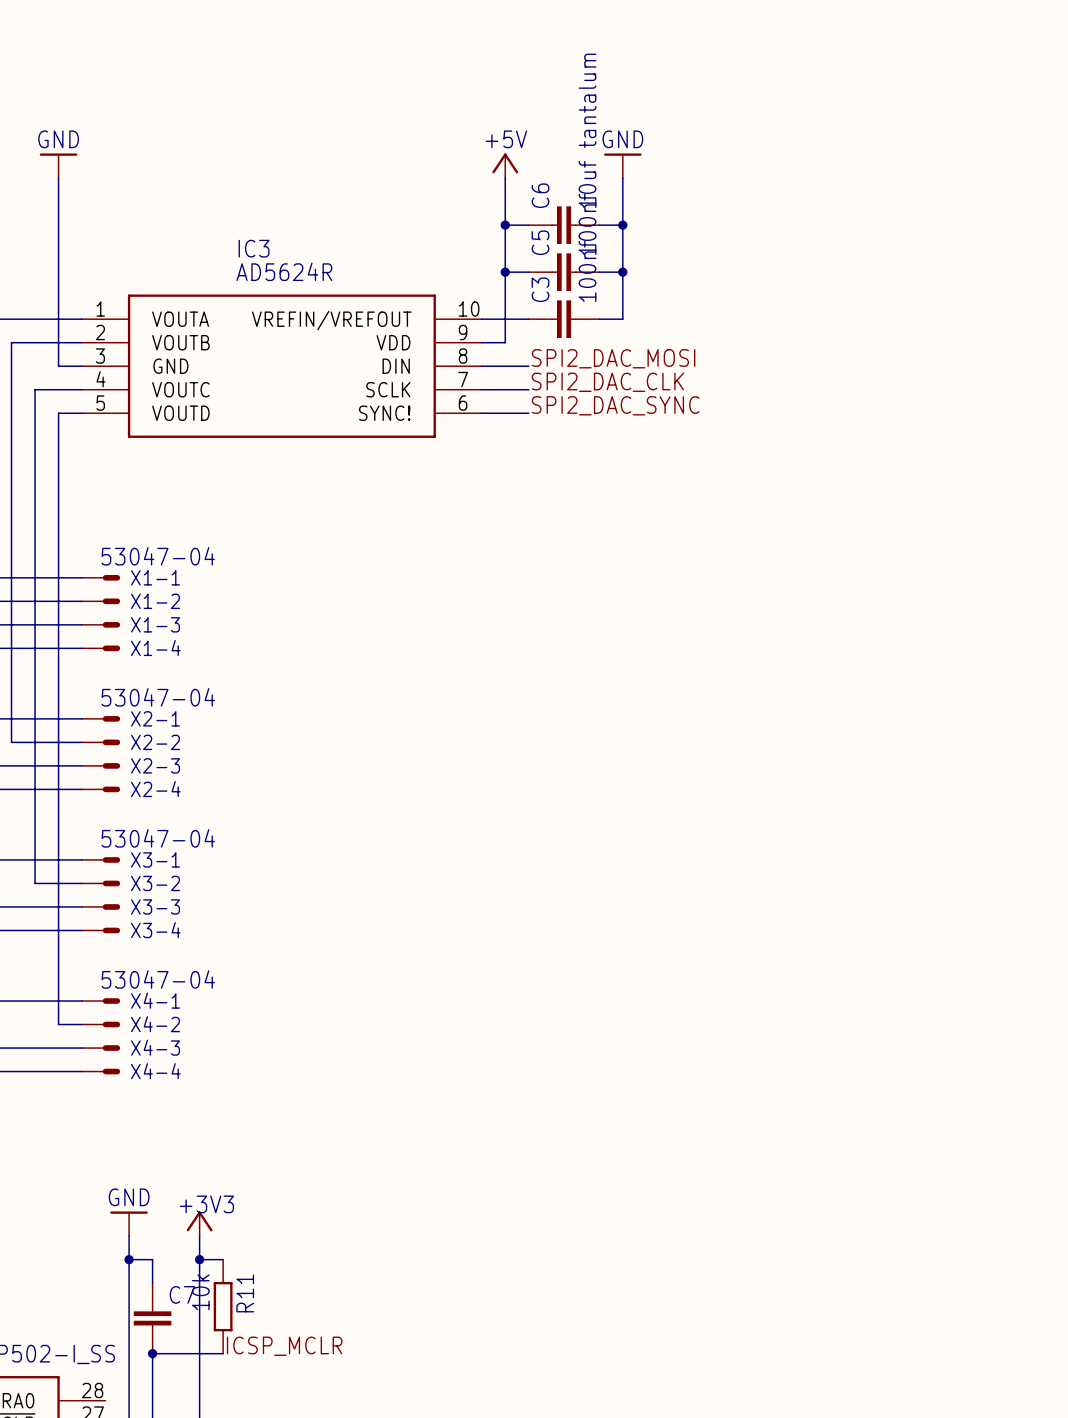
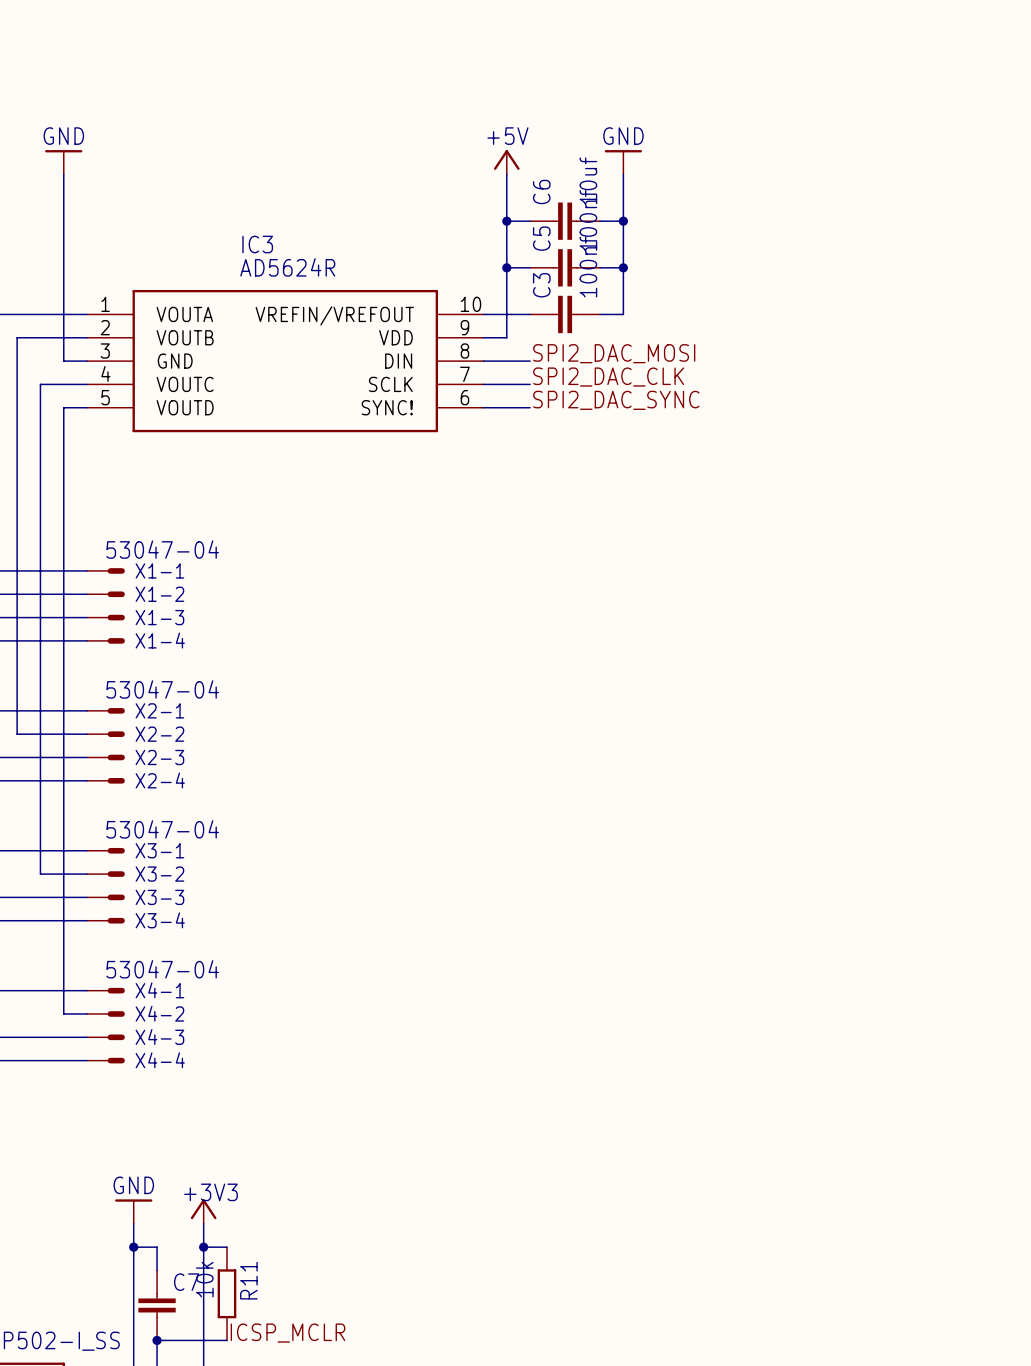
C6 value: 10uf tantalum (587, 130) -> 10uf (588, 180)

